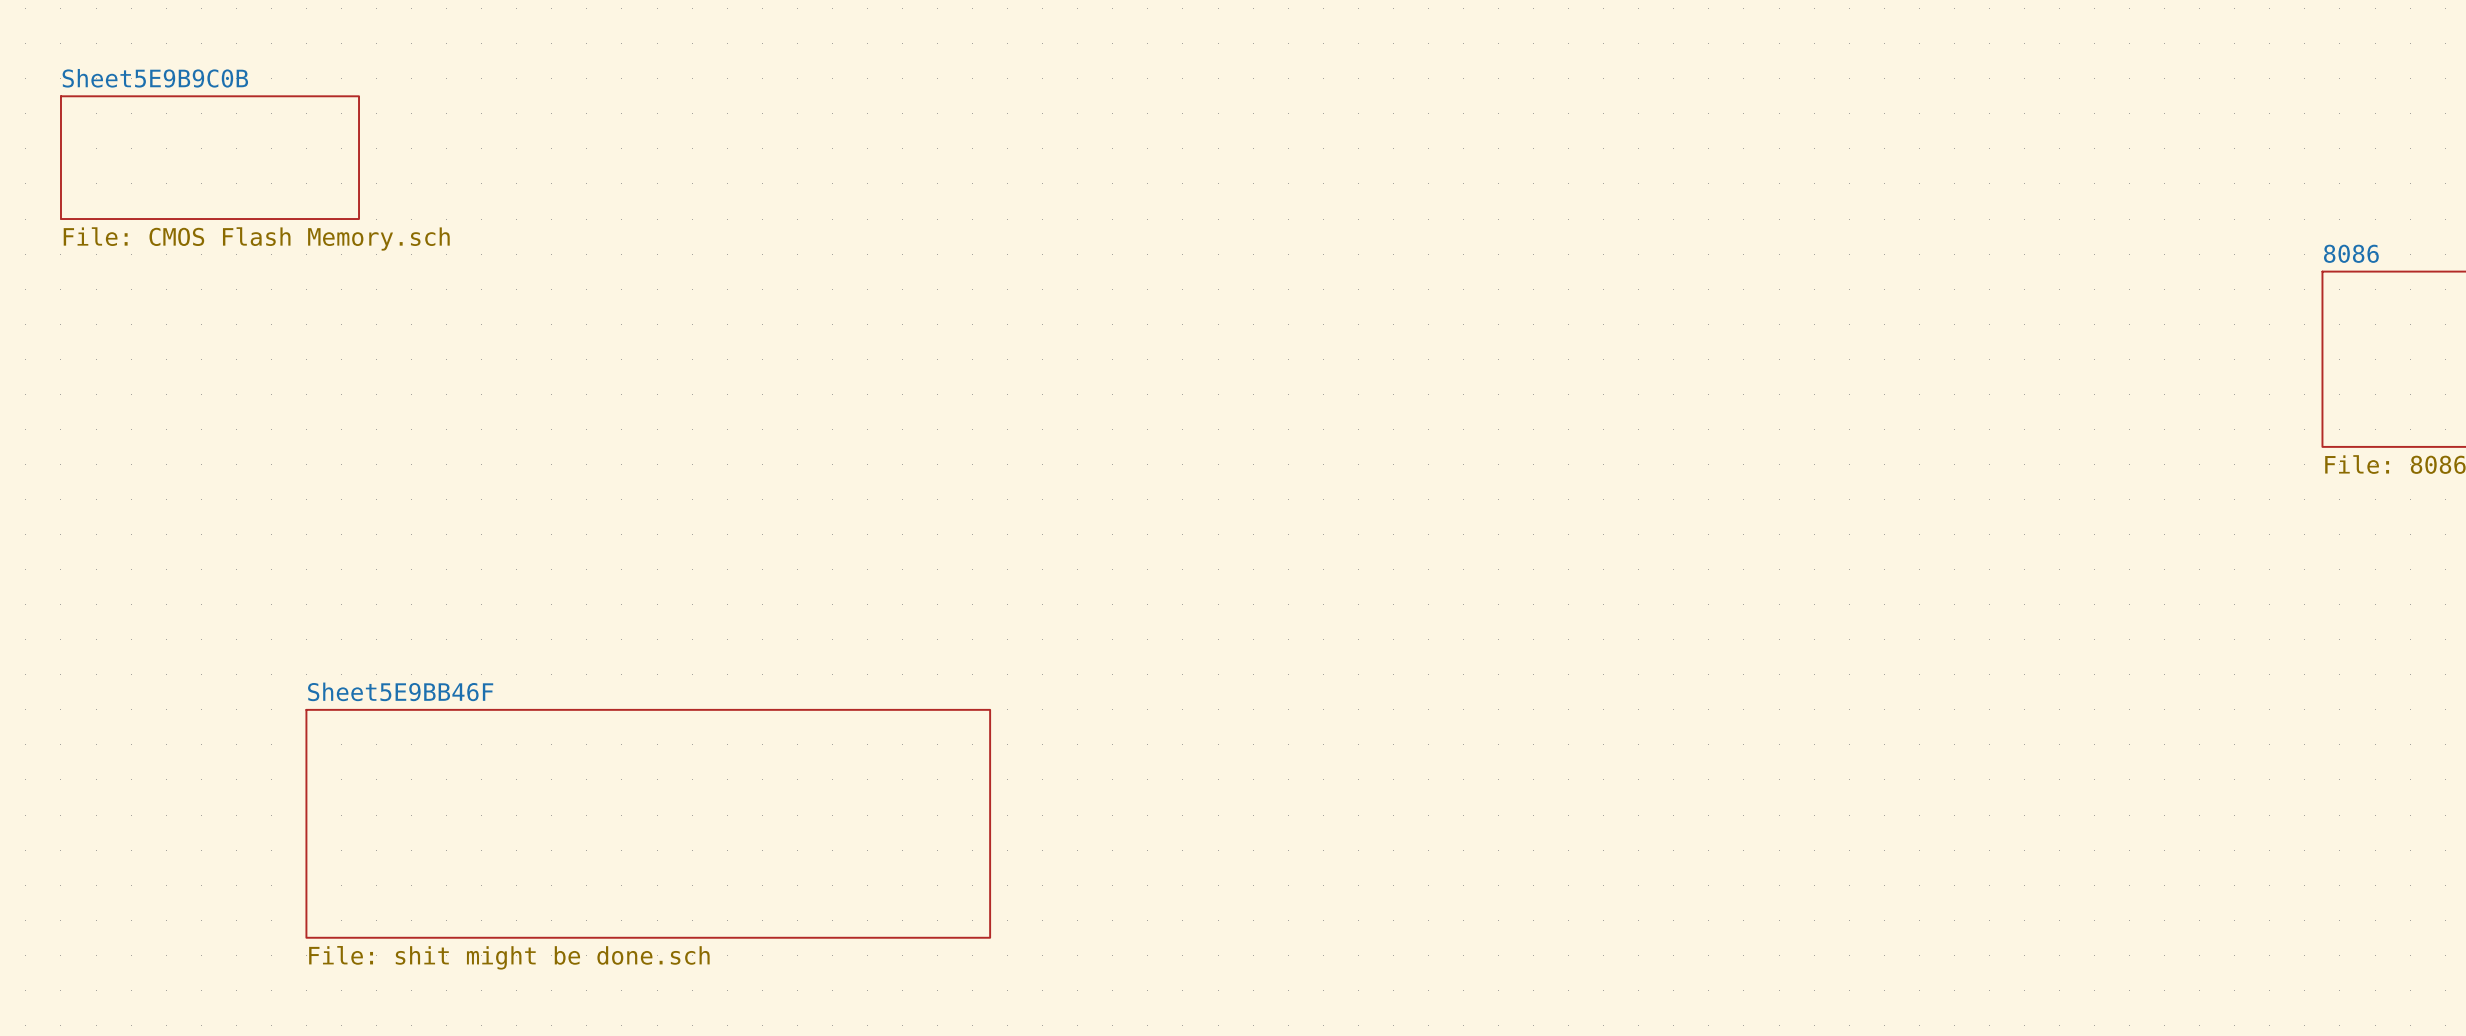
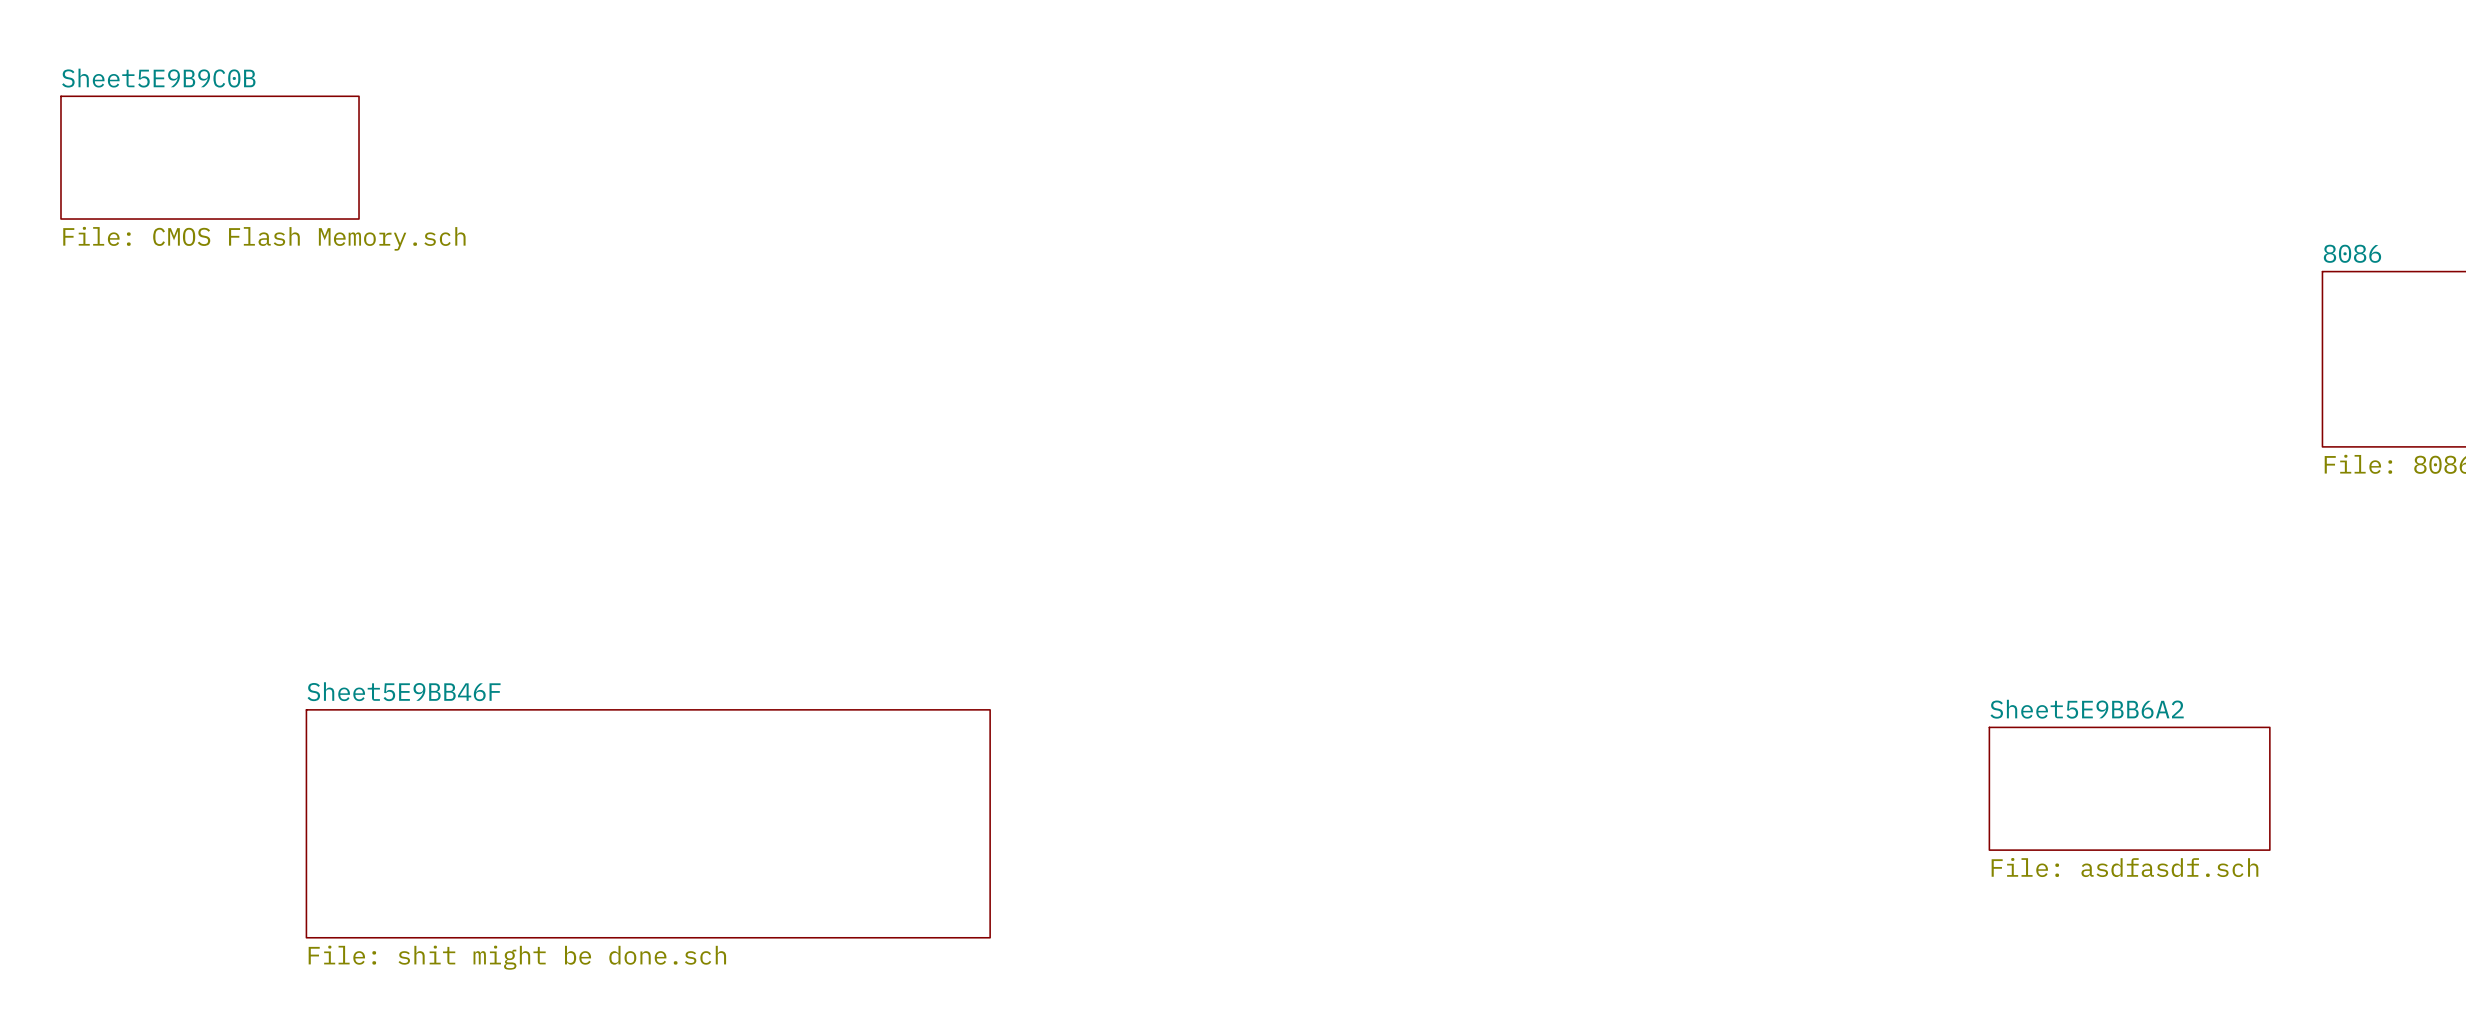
sheet Sheet5E9BB6A2: none -> File: asdfasdf.sch (2129, 788)

